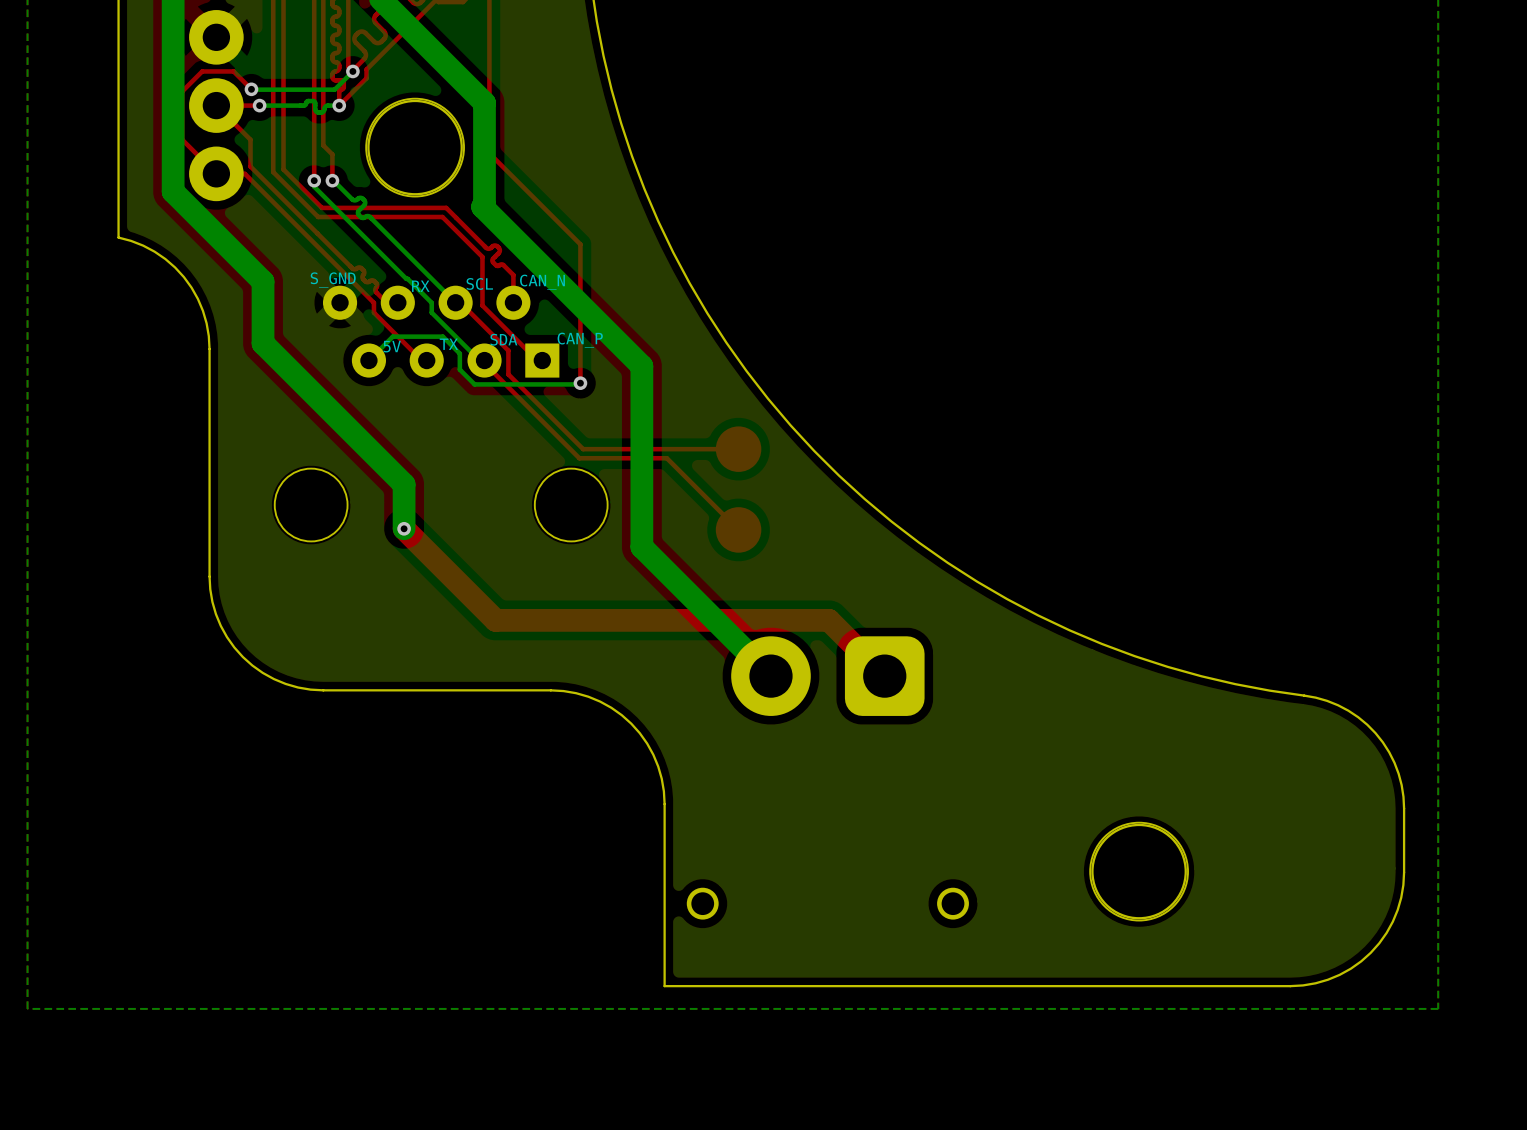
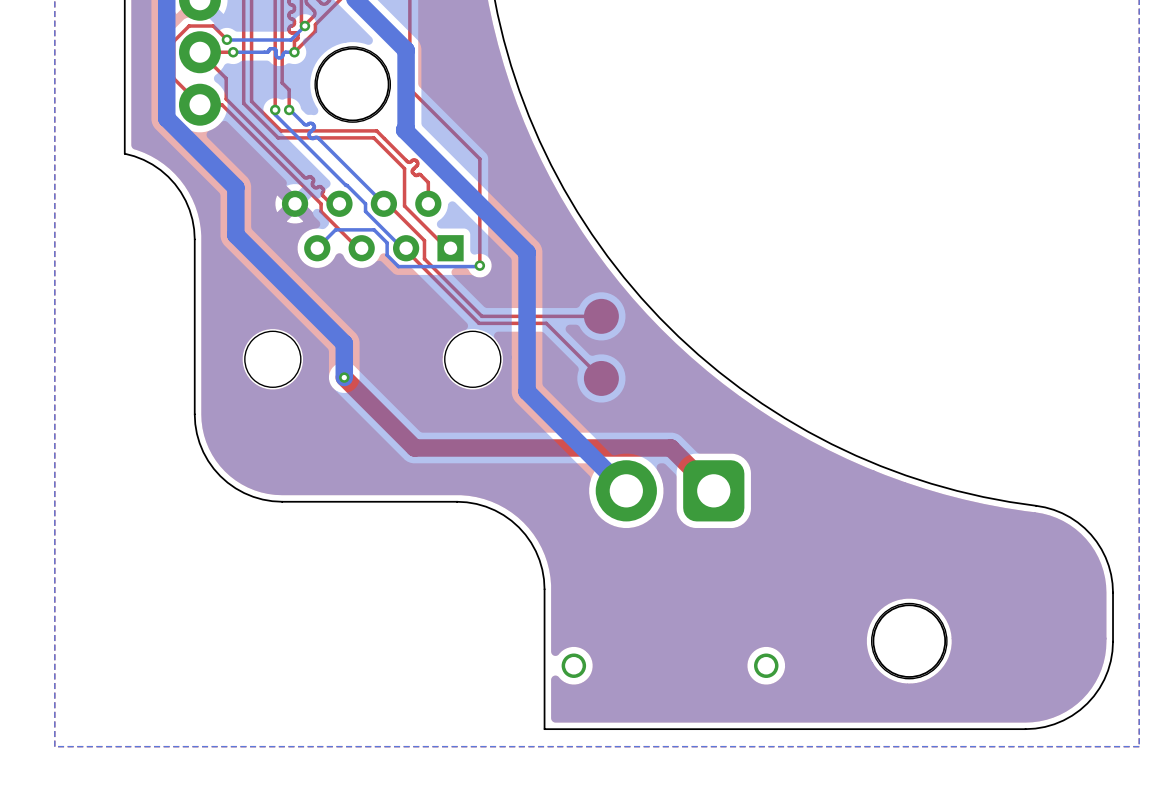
text: S_GND (333, 280) -> none
text: CAN_N (542, 282) -> none
text: SCL (479, 283) -> none
text: RX (420, 286) -> none
text: SDA (503, 339) -> none
text: CAN_P (580, 340) -> none
text: TX (448, 344) -> none
text: 5V (392, 346) -> none

